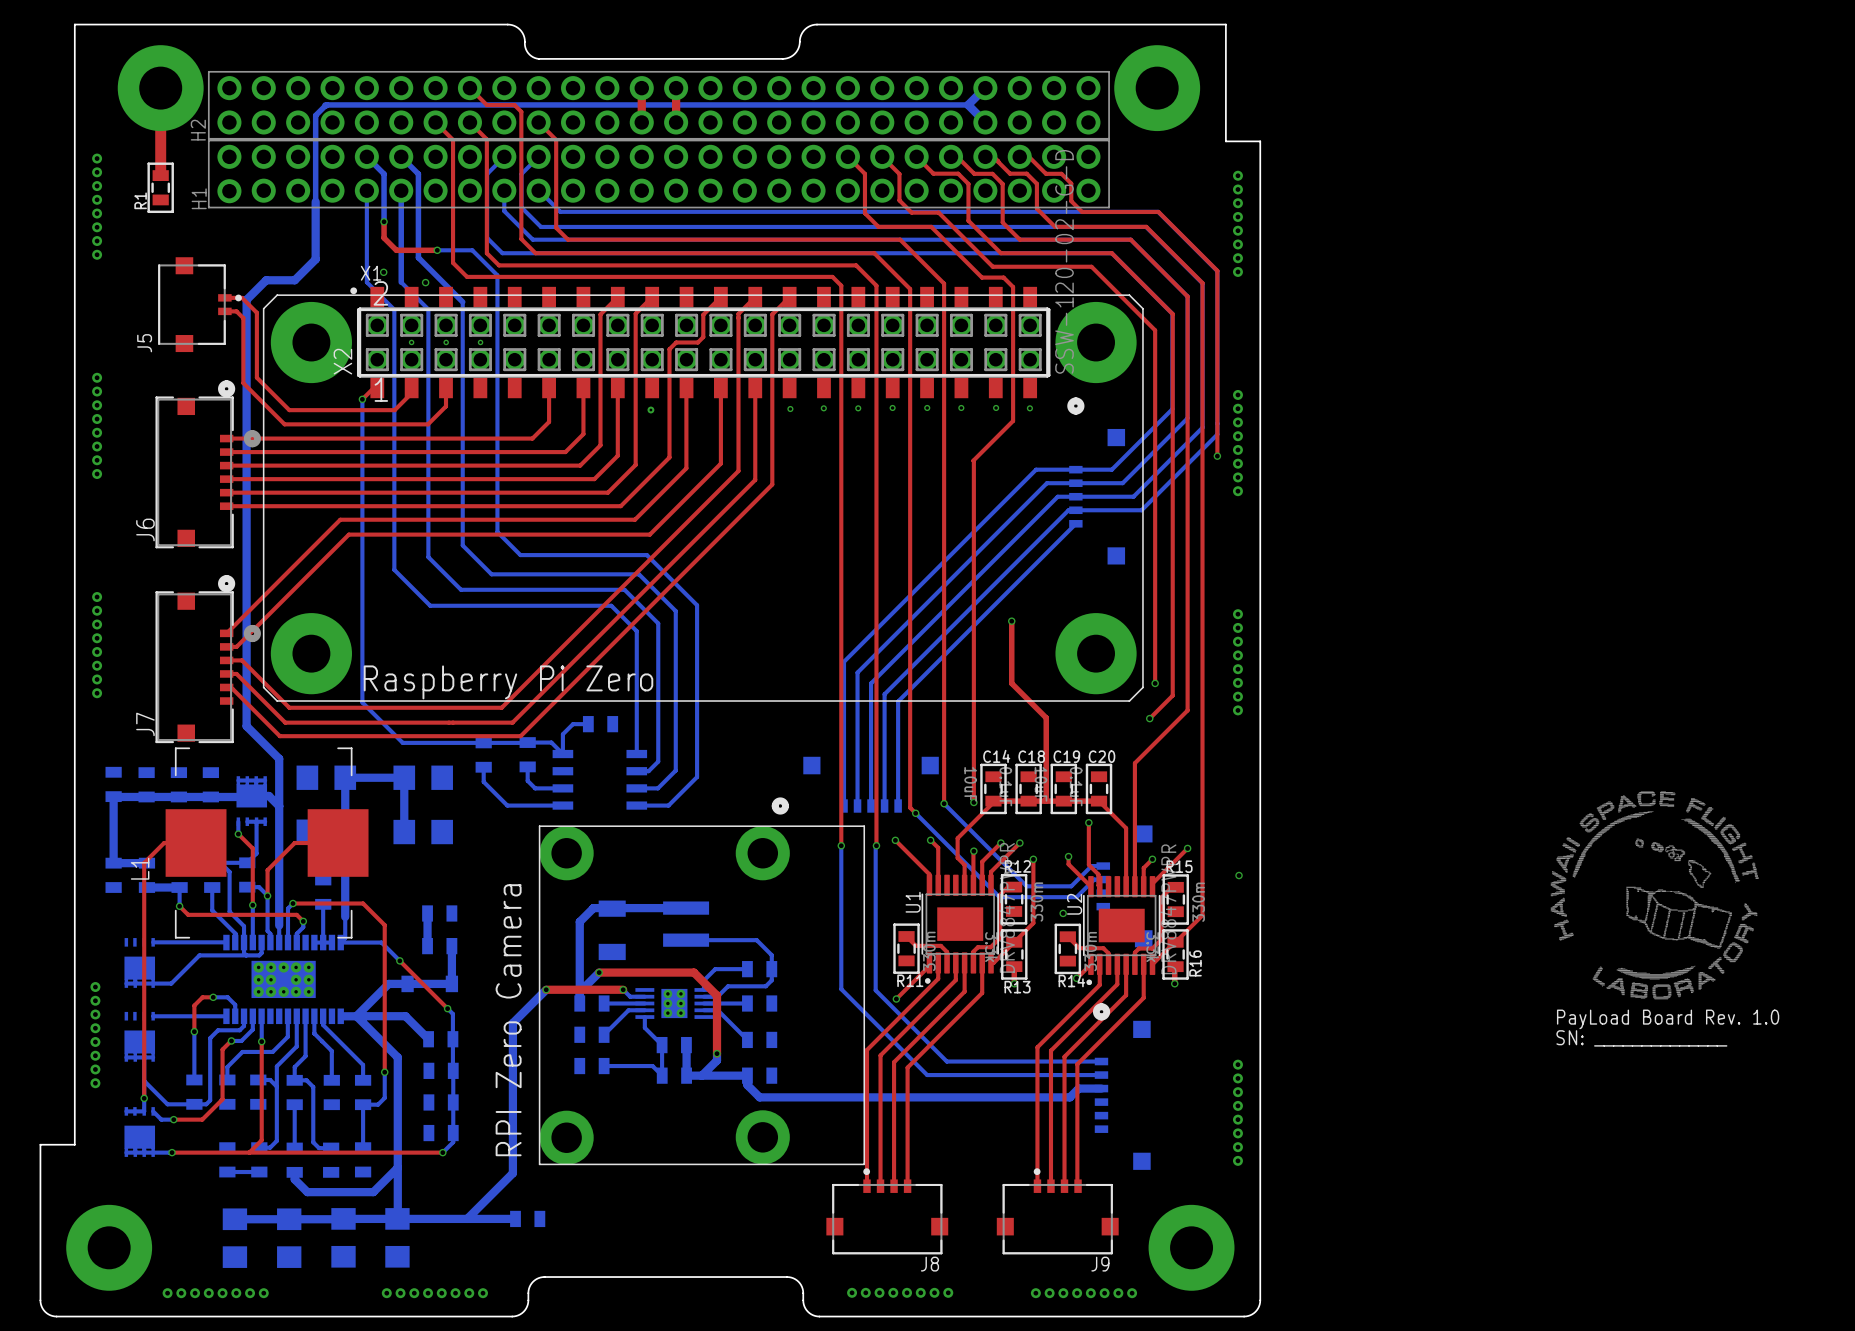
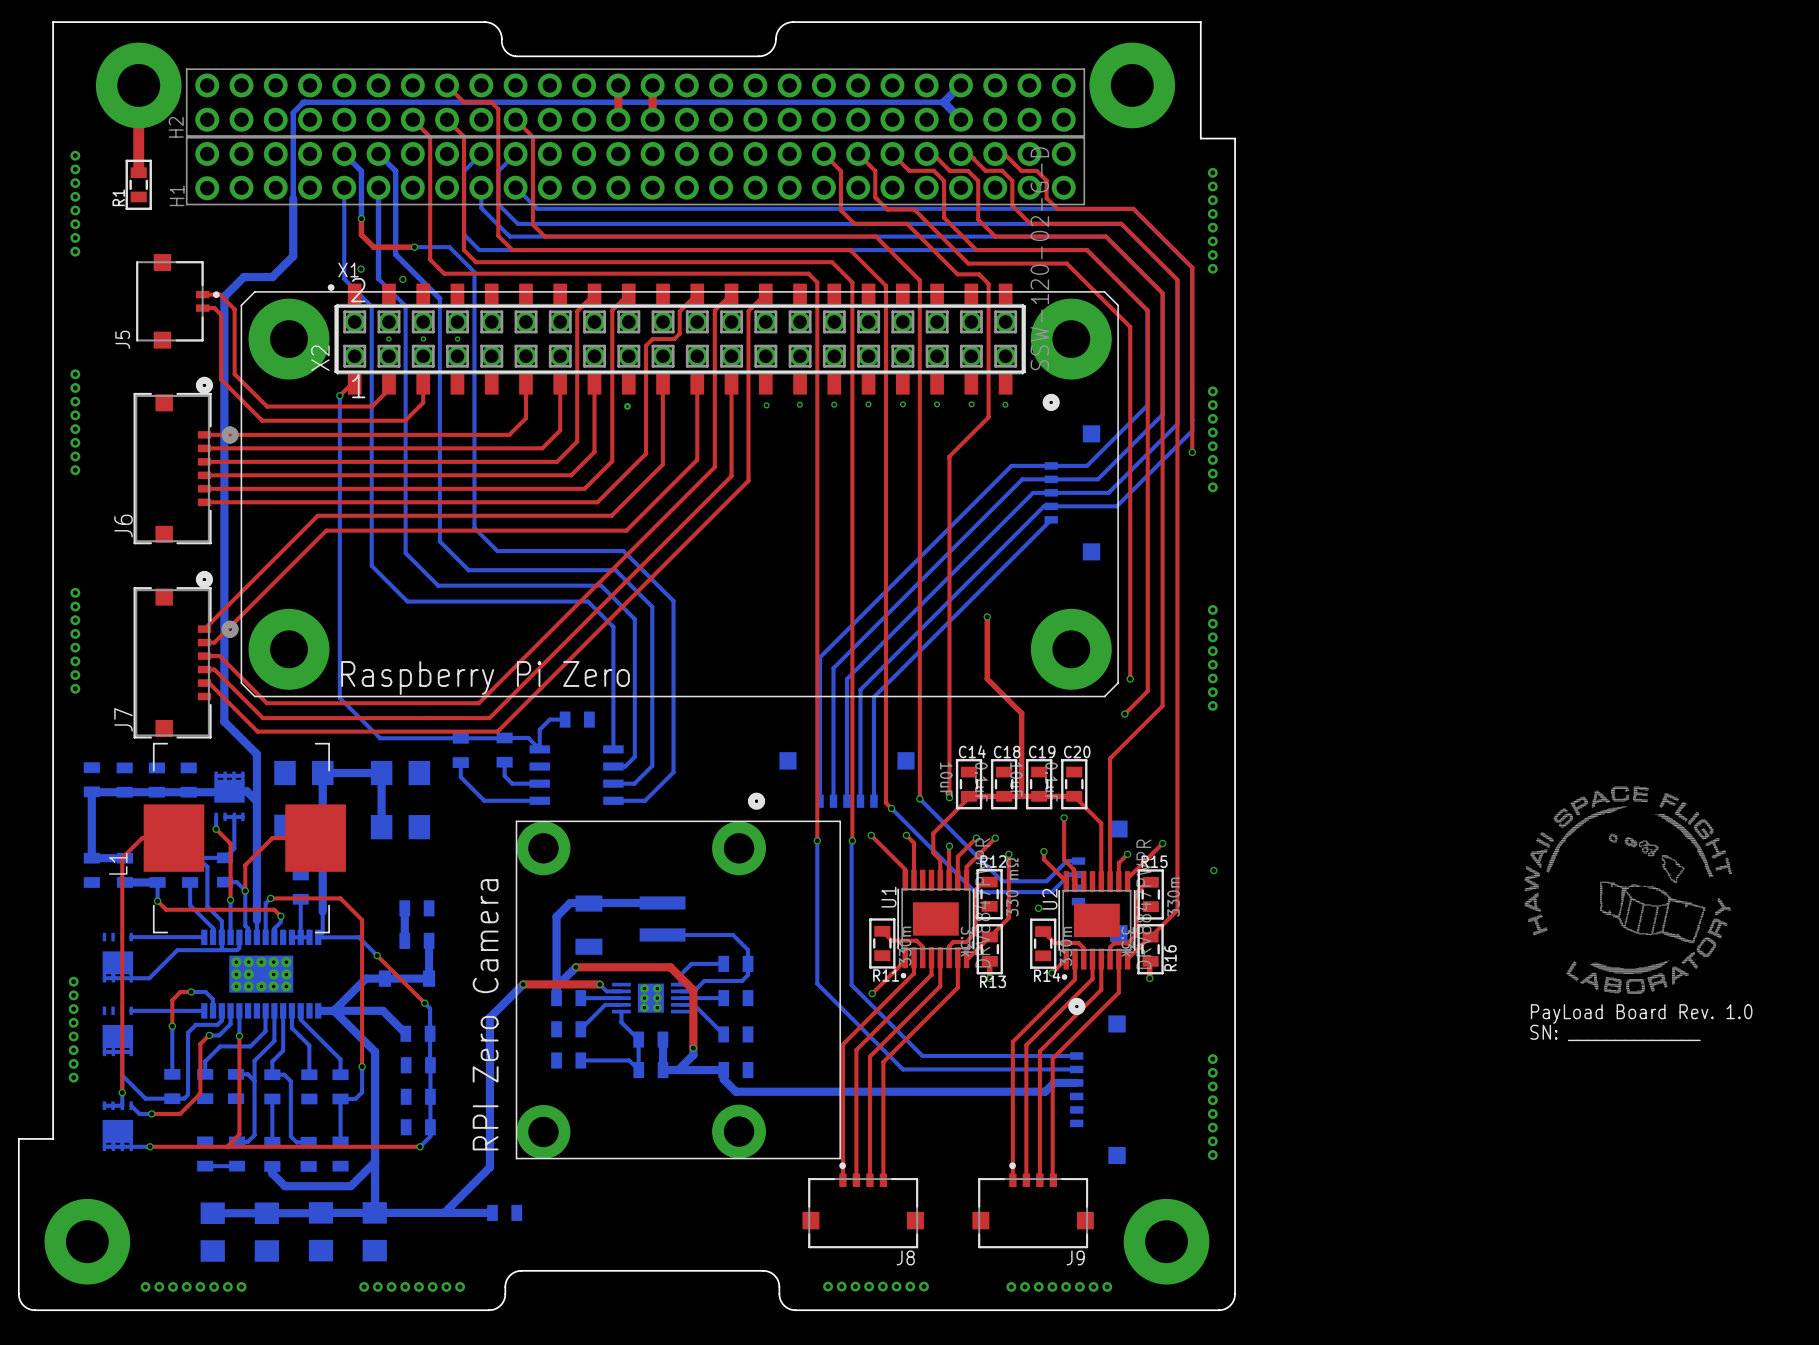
R12 value: 330m (1036, 902) -> 330 mΩ (1012, 887)

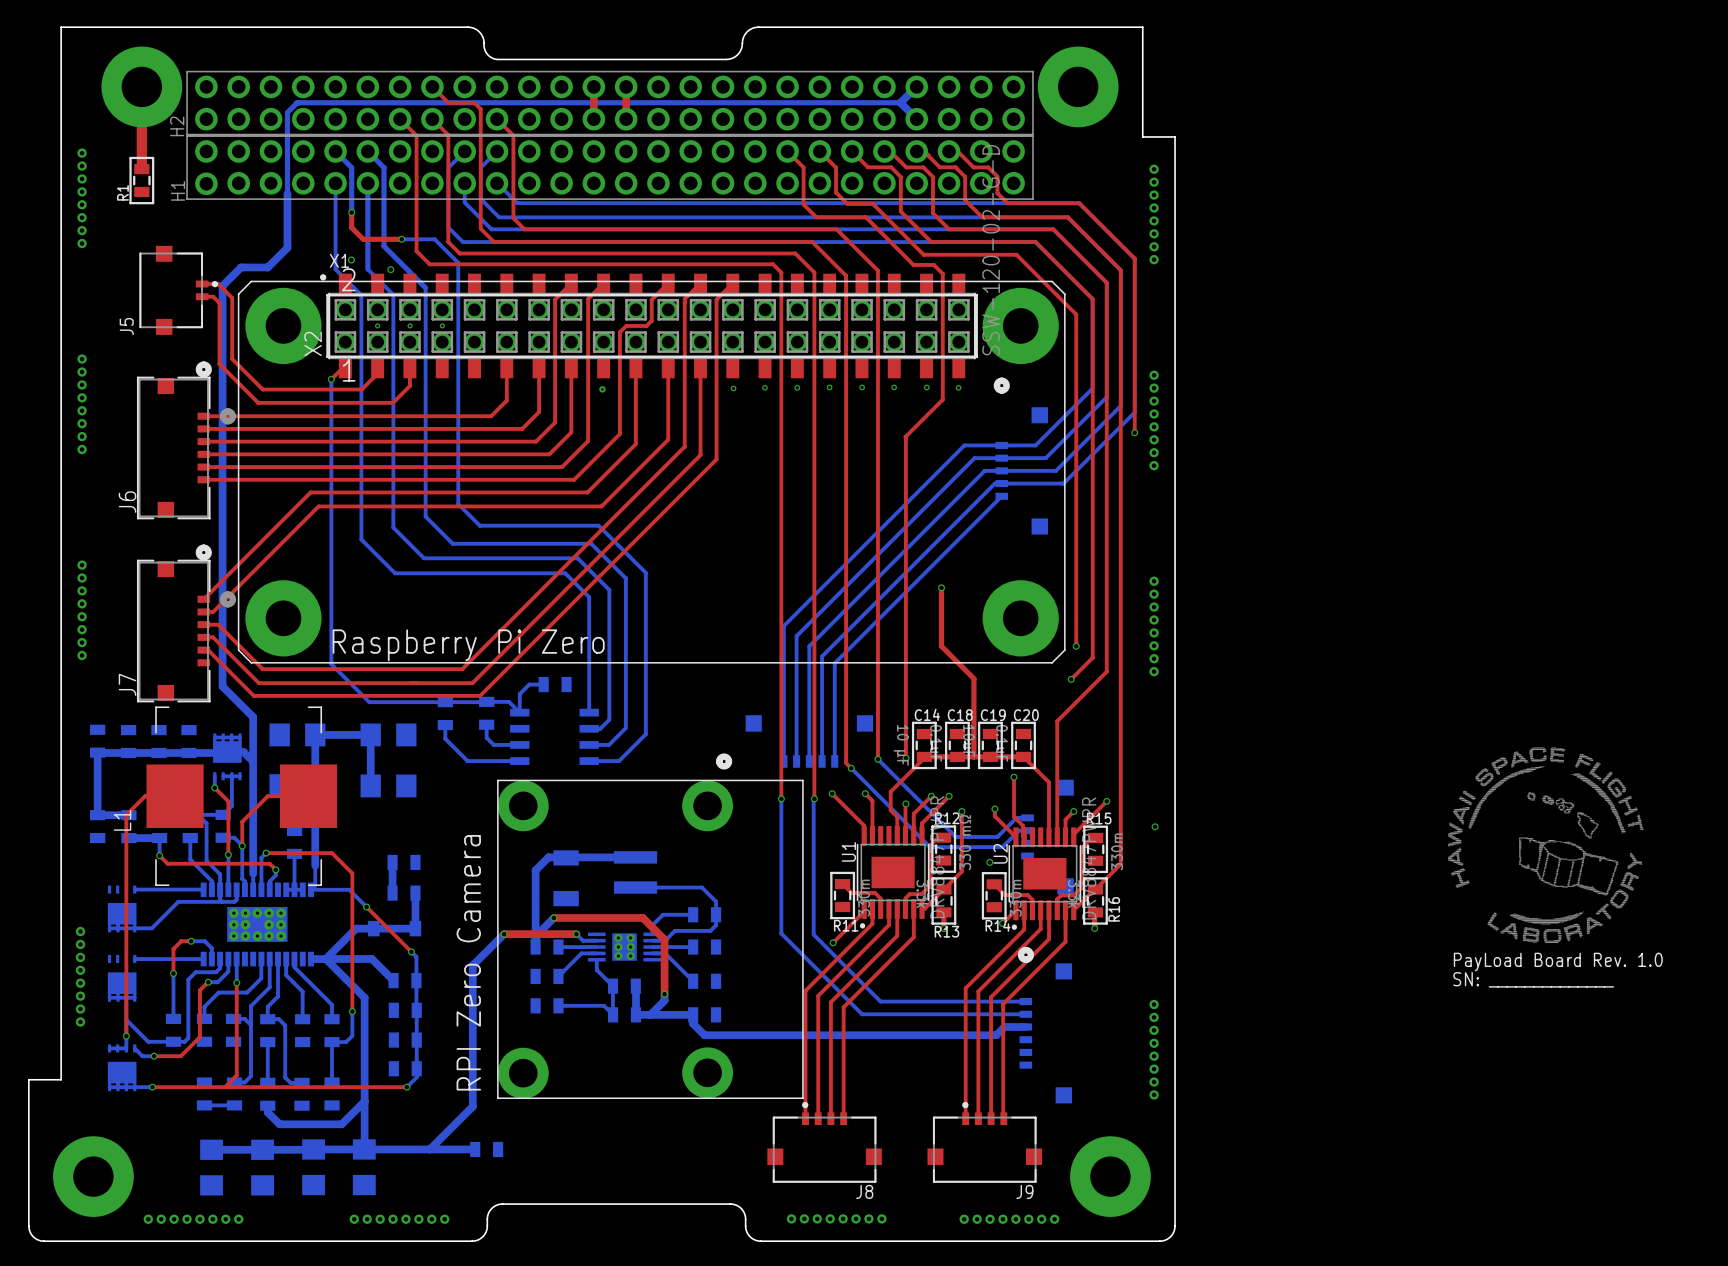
C14 value: 10uF (946, 779) -> 10 μF (901, 745)

